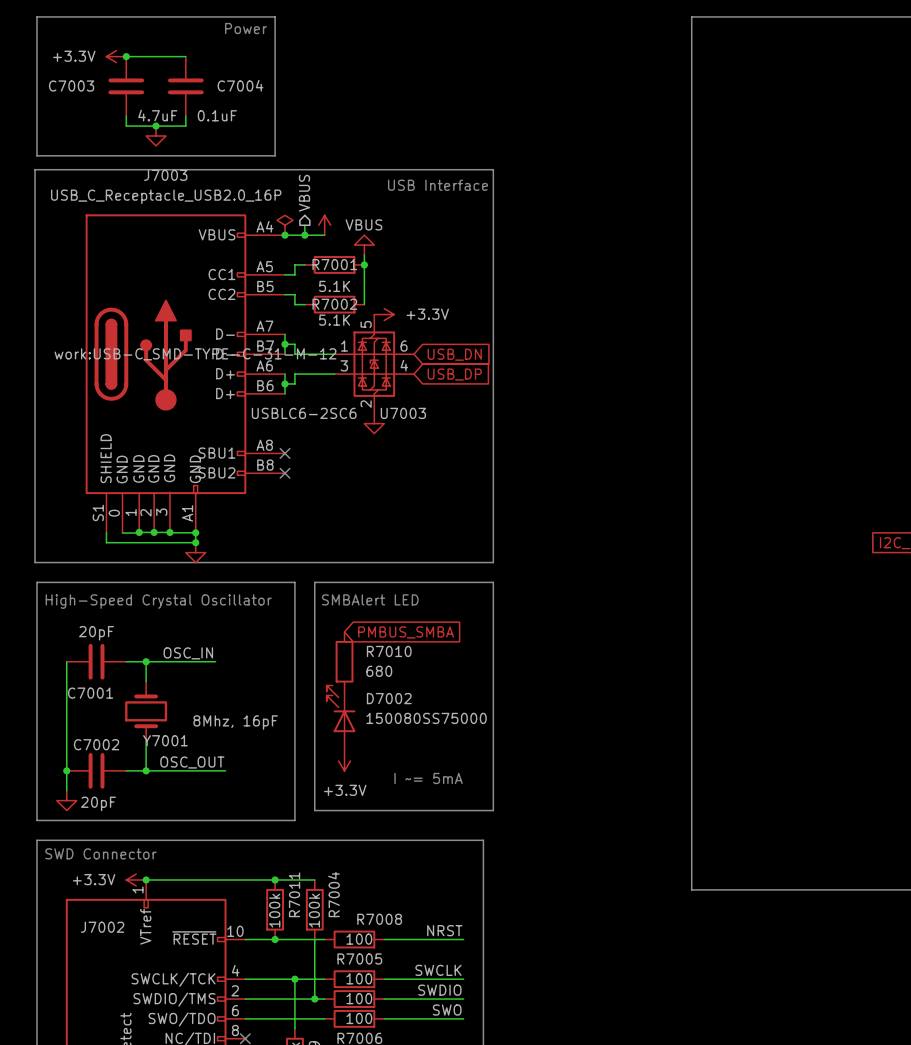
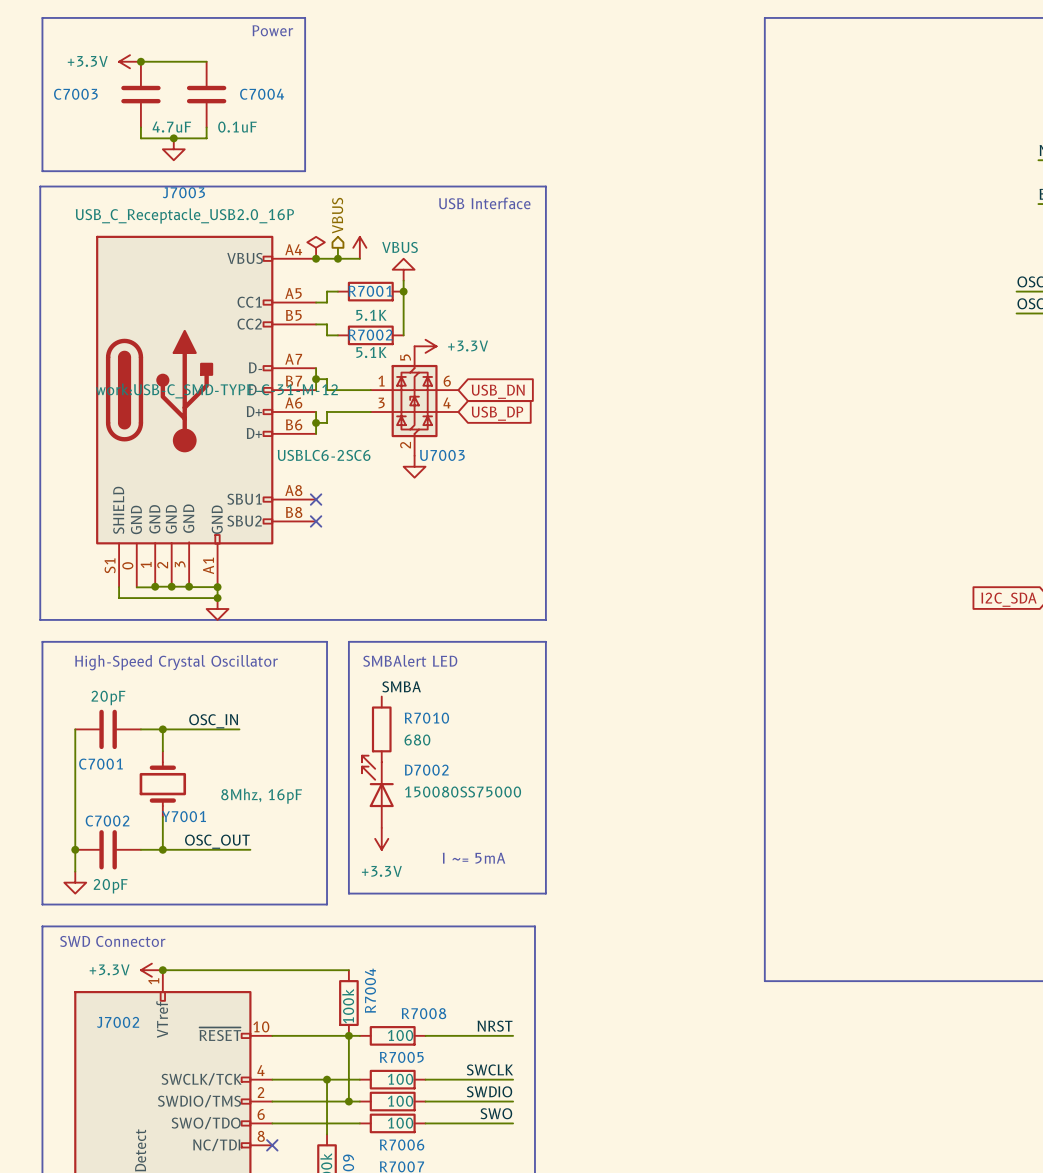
label: none -> SMBA (401, 686)
global label: PMBUS_SMBA (406, 632) -> none
junction: (275, 879) -> none
R7011: 100k (275, 909) -> none
junction: (275, 939) -> none
junction: none -> (348, 1035)

